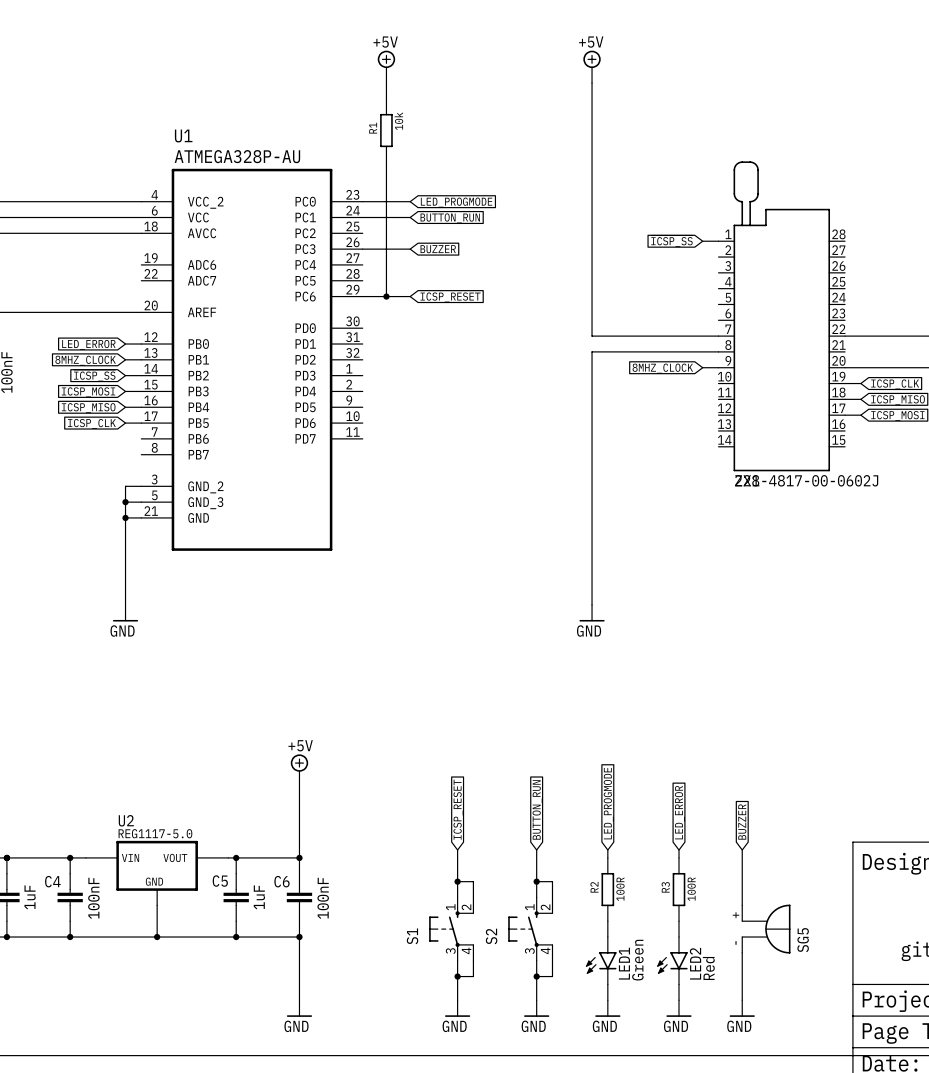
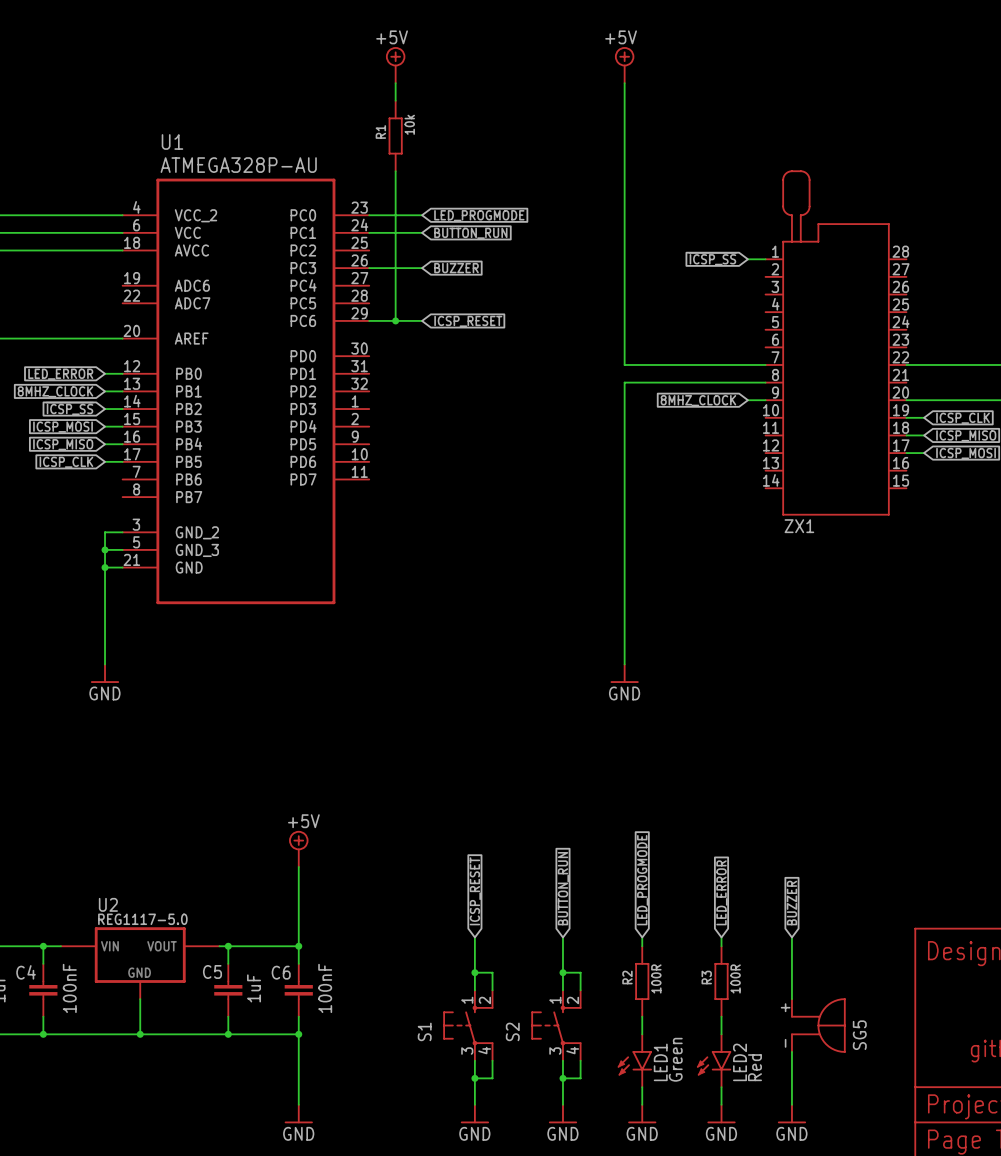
ZX1 value: 228-4817-00-0602J (806, 480) -> none

